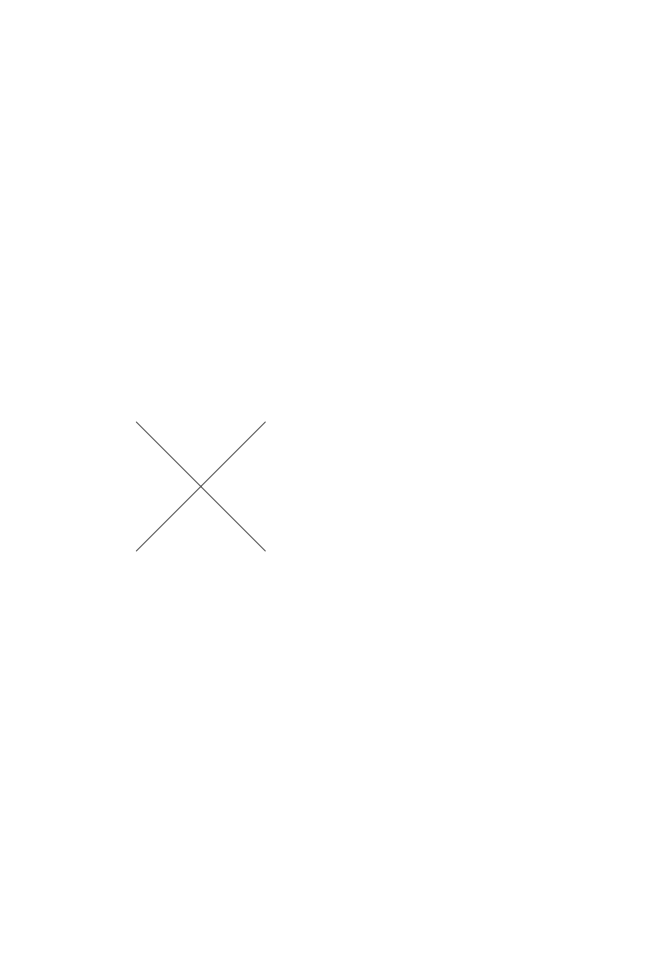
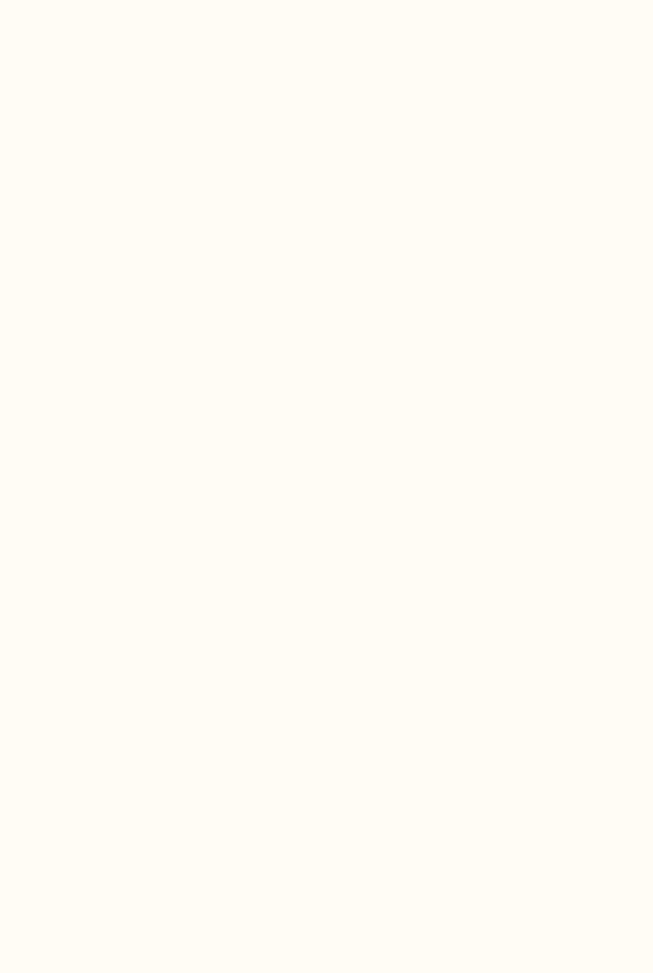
no-connect mark: (200, 486) -> none

